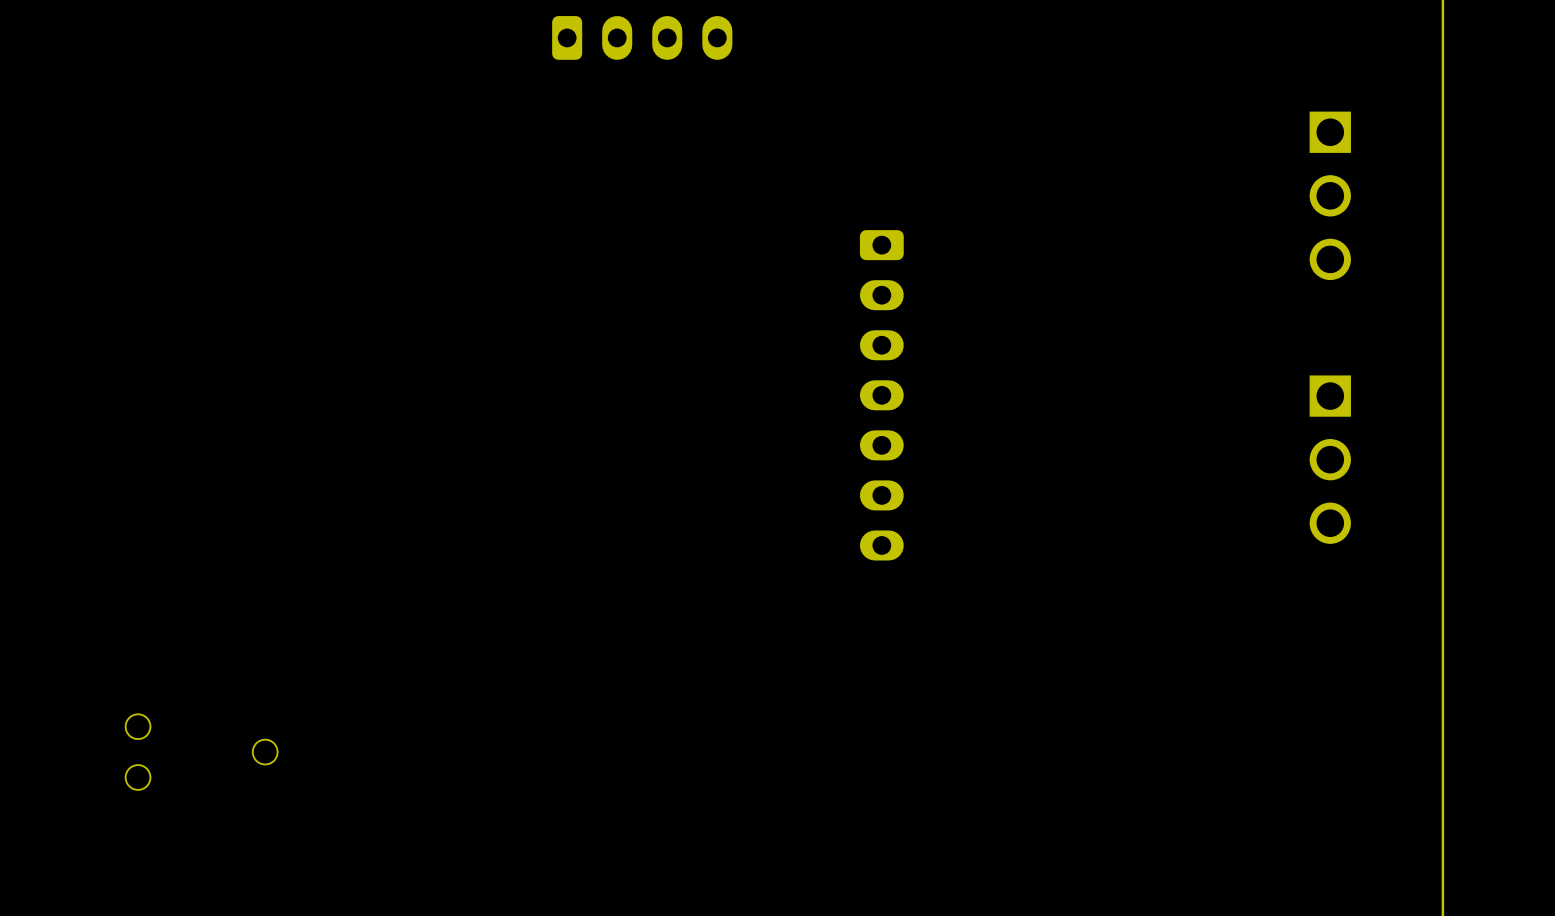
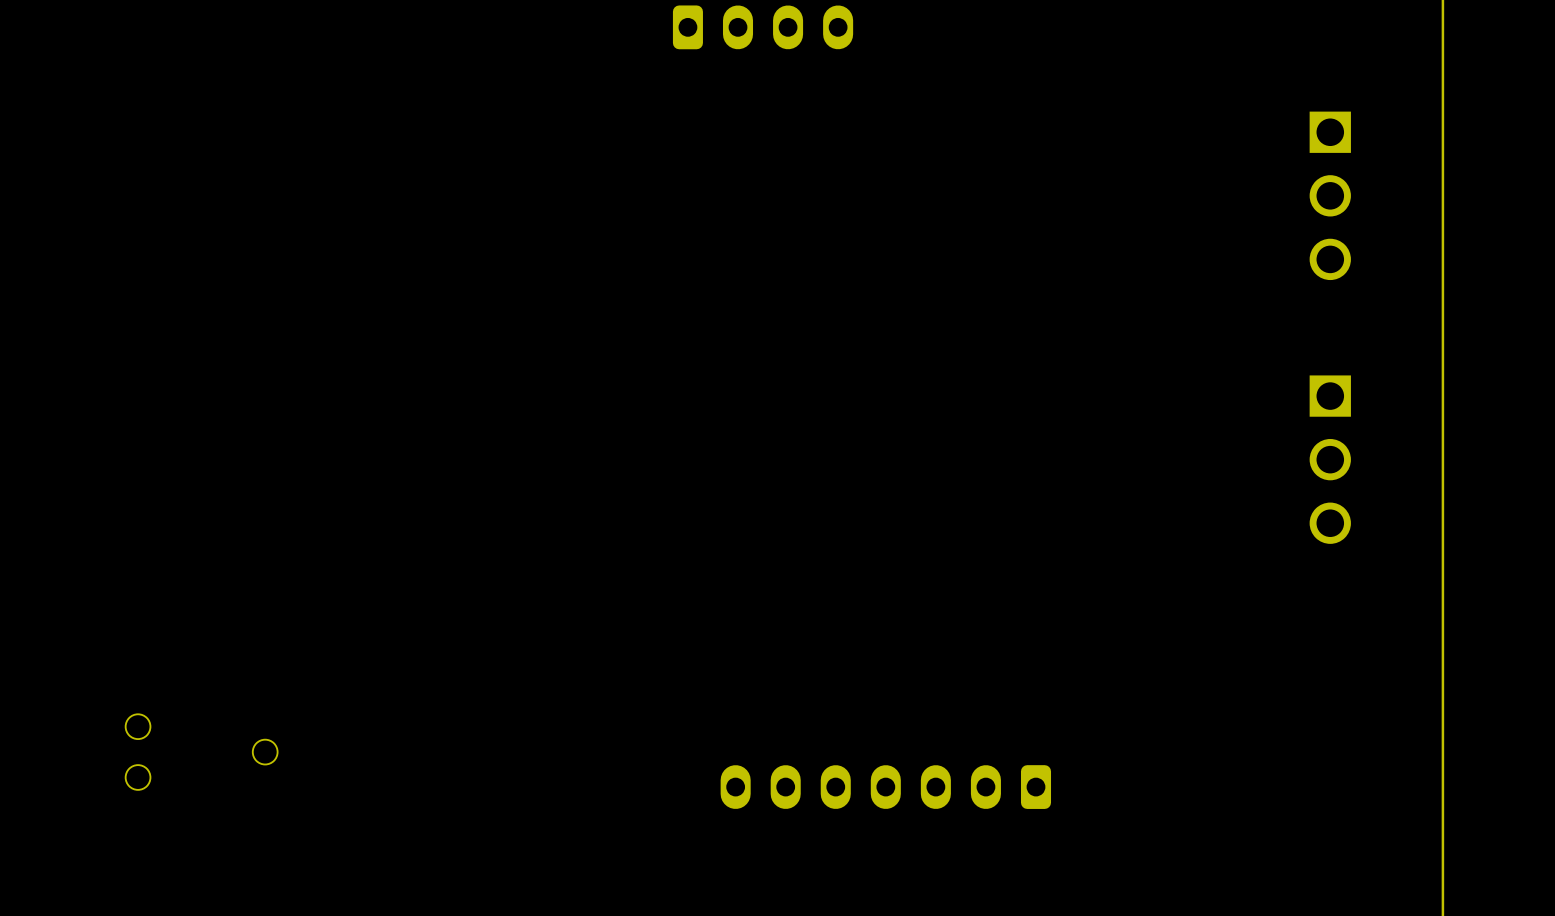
part position: (642, 37) -> (763, 27)
part rotation: 0° (881, 395) -> 90° clockwise (885, 787)
part position: (881, 395) -> (885, 787)

